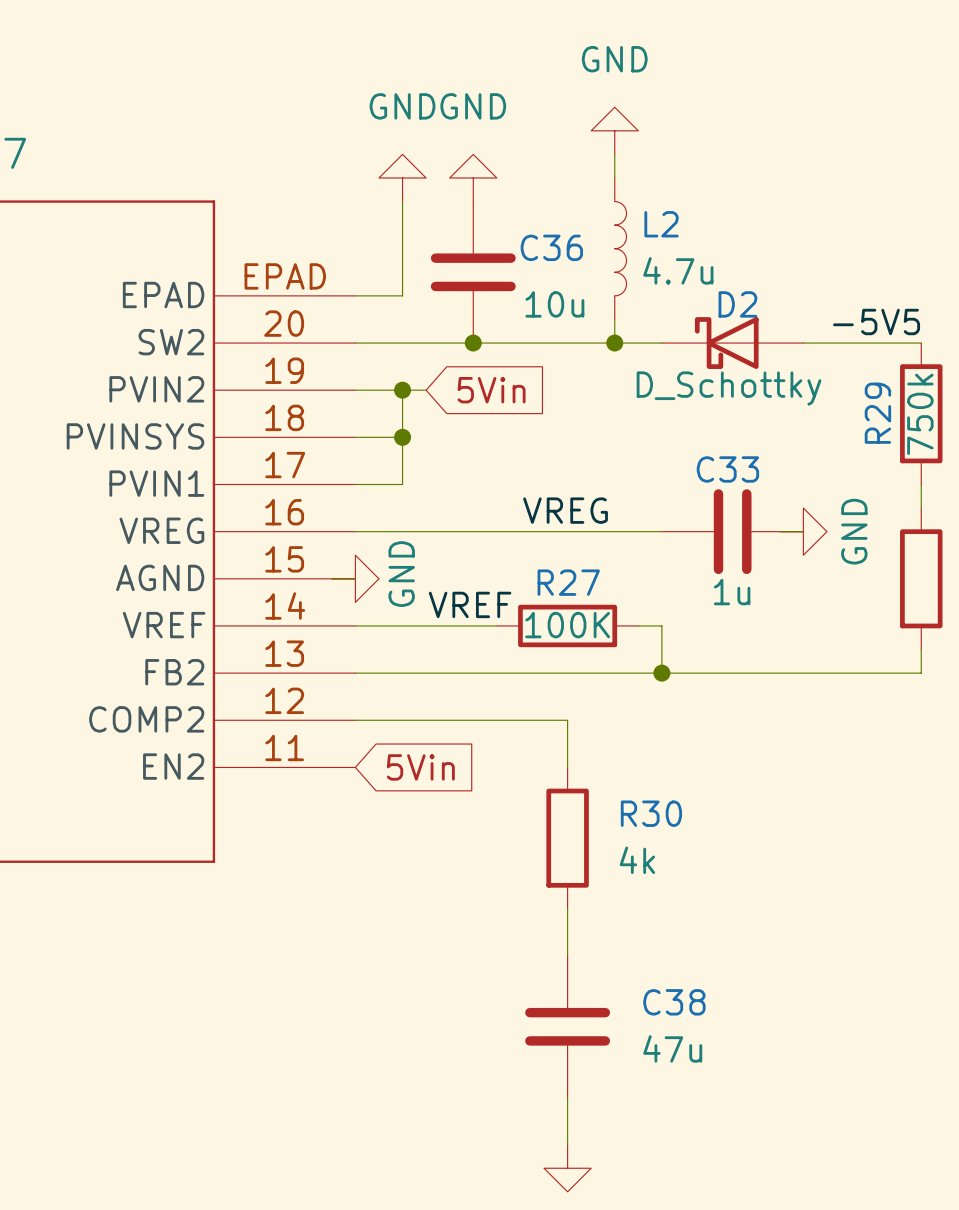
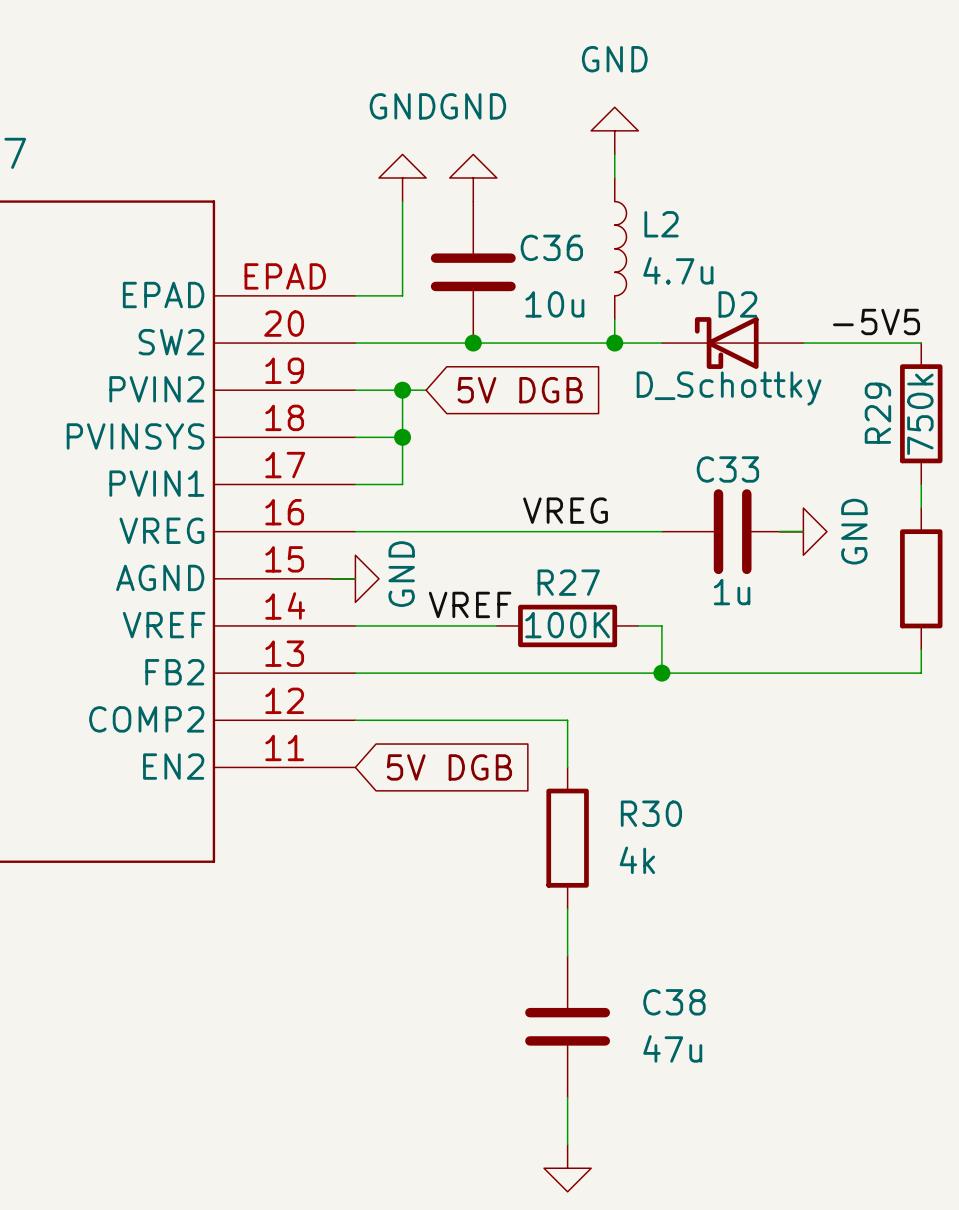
global label: 5Vin (491, 390) -> 5V DGB (520, 390)
global label: 5Vin (420, 767) -> 5V DGB (449, 767)

